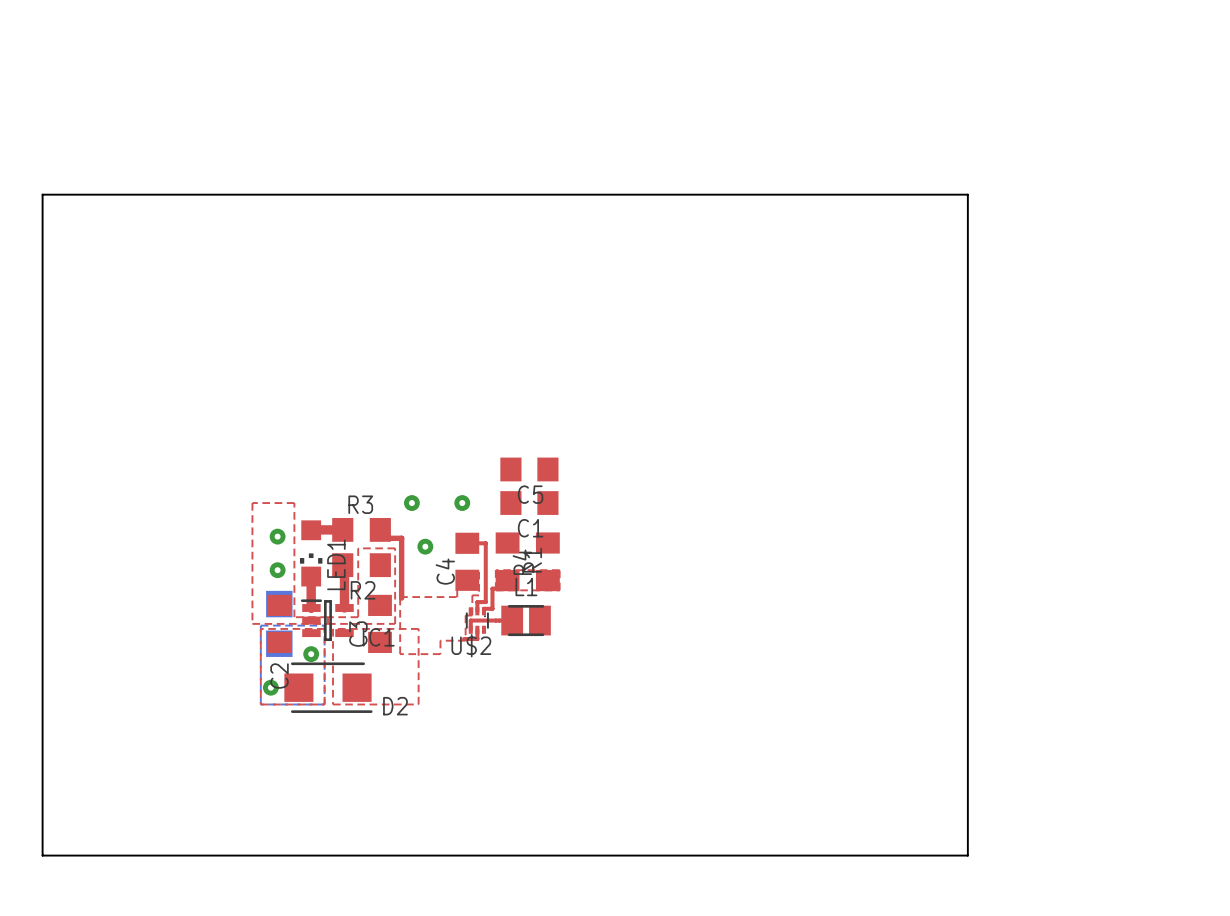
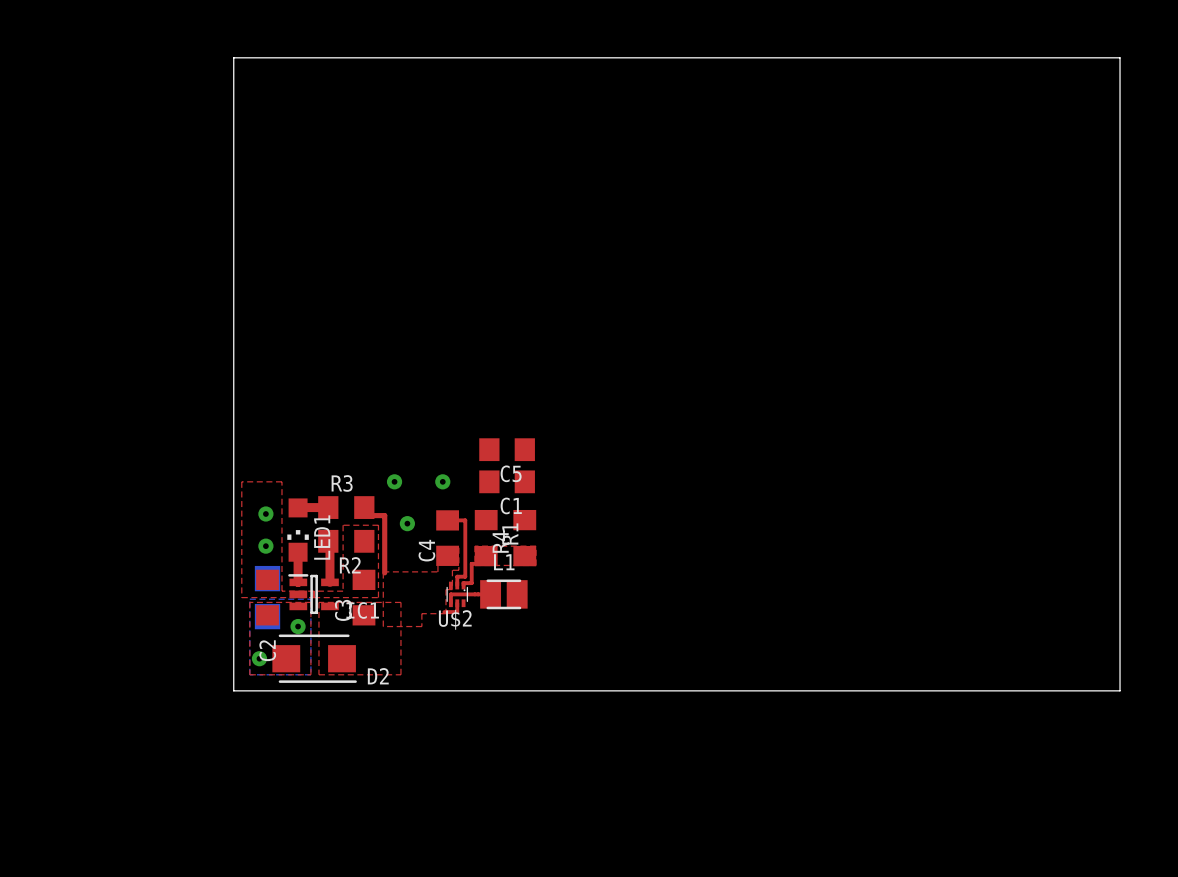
board edge: (42, 194) (967, 194) (967, 855) (42, 855) (42, 194) -> (233, 57) (1120, 57) (1120, 690) (233, 690) (233, 57)

